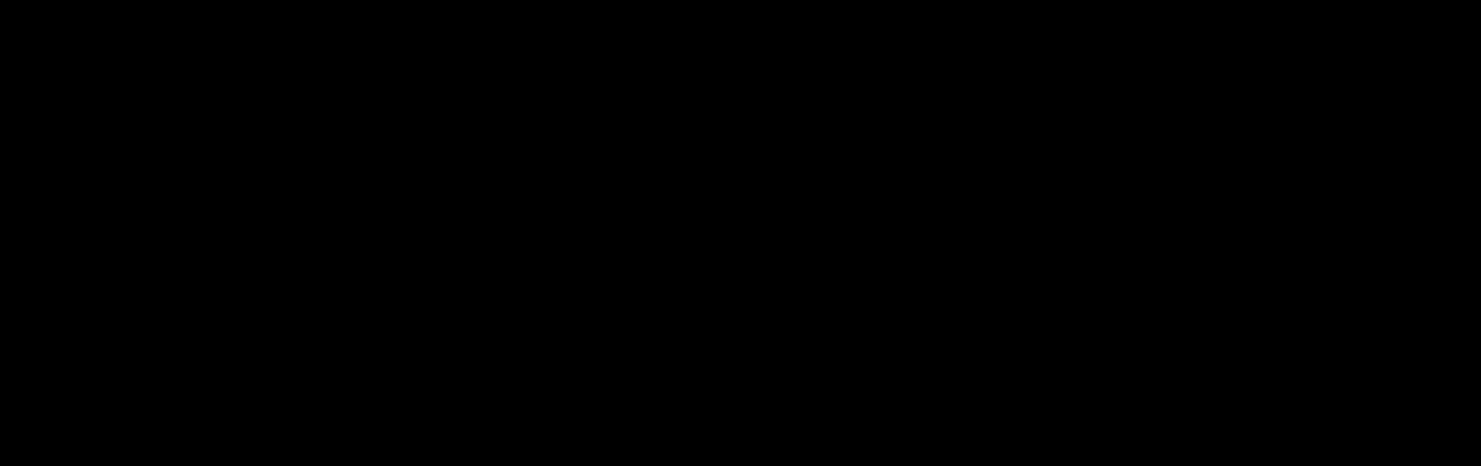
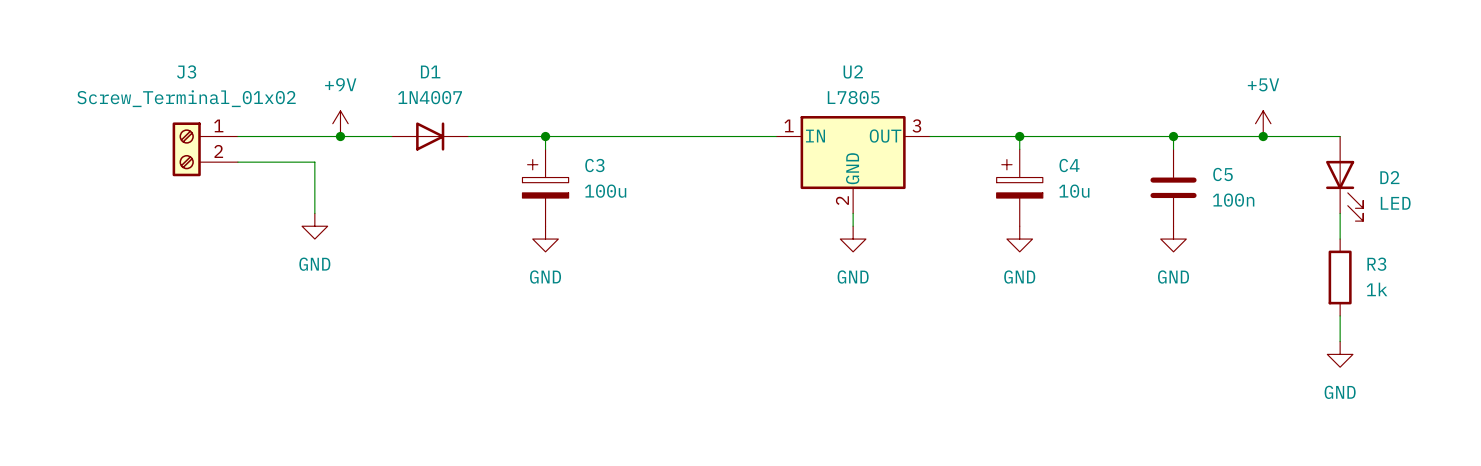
power symbol: none -> +9V (340, 123)
power symbol: none -> +5V (1263, 123)
wire: none -> (237, 136) (391, 136)
junction: none -> (340, 136)
D1: none -> 1N4007 (430, 136)
wire: none -> (468, 136) (776, 136)
wire: none -> (545, 136) (545, 149)
junction: none -> (545, 136)
wire: none -> (930, 136) (1340, 136)
wire: none -> (1019, 136) (1019, 149)
junction: none -> (1019, 136)
wire: none -> (1173, 136) (1173, 149)
junction: none -> (1173, 136)
junction: none -> (1263, 136)
J3: none -> Screw_Terminal_01x02 (205, 149)
wire: none -> (237, 162) (314, 162) (314, 213)
U2: none -> L7805 (853, 164)
D2: none -> LED (1344, 178)
C3: none -> 100u (545, 187)
C4: none -> 10u (1019, 187)
C5: none -> 100n (1173, 187)
wire: none -> (853, 213) (853, 226)
wire: none -> (1340, 213) (1340, 239)
power symbol: none -> GND (314, 226)
power symbol: none -> GND (545, 239)
power symbol: none -> GND (853, 239)
power symbol: none -> GND (1019, 239)
power symbol: none -> GND (1173, 239)
R3: none -> 1k (1340, 277)
wire: none -> (1340, 315) (1340, 341)
power symbol: none -> GND (1340, 354)

